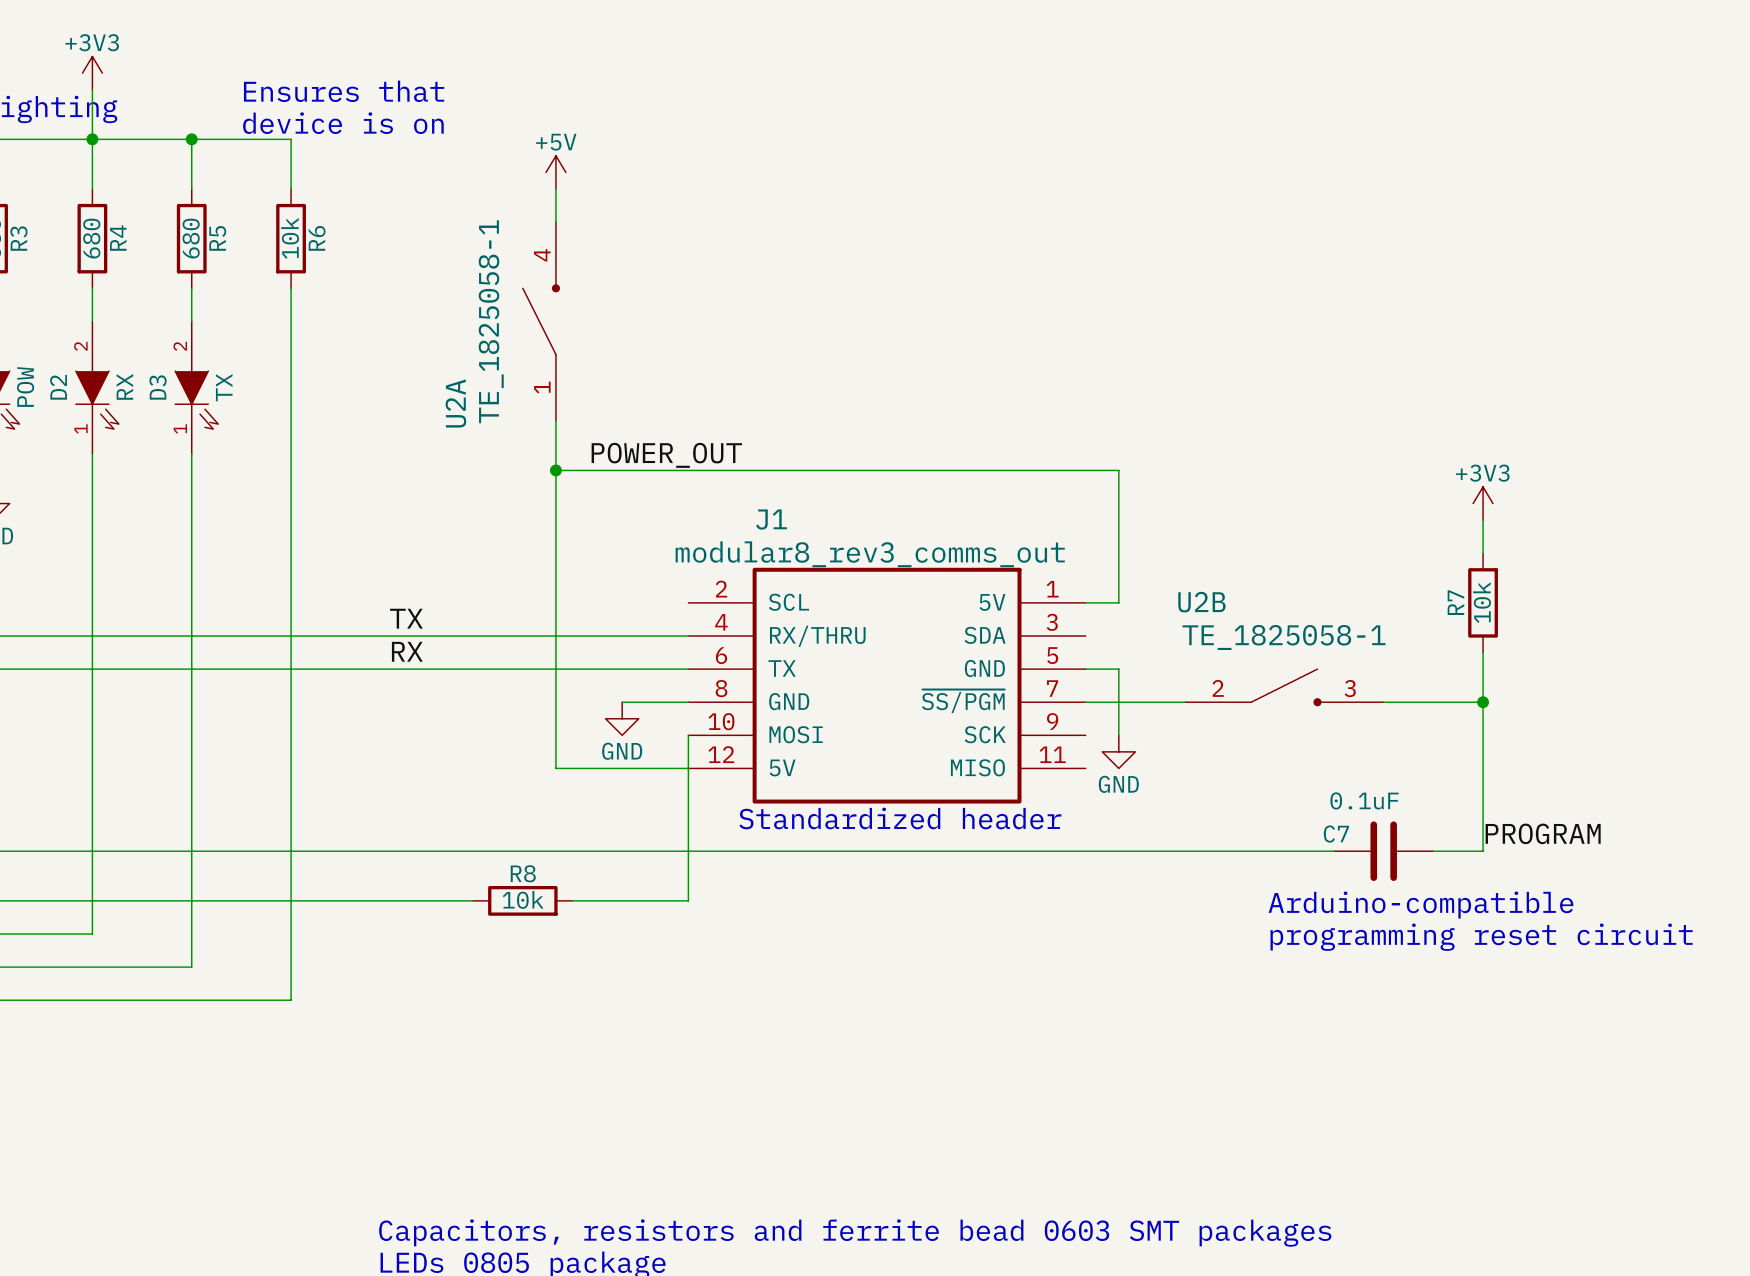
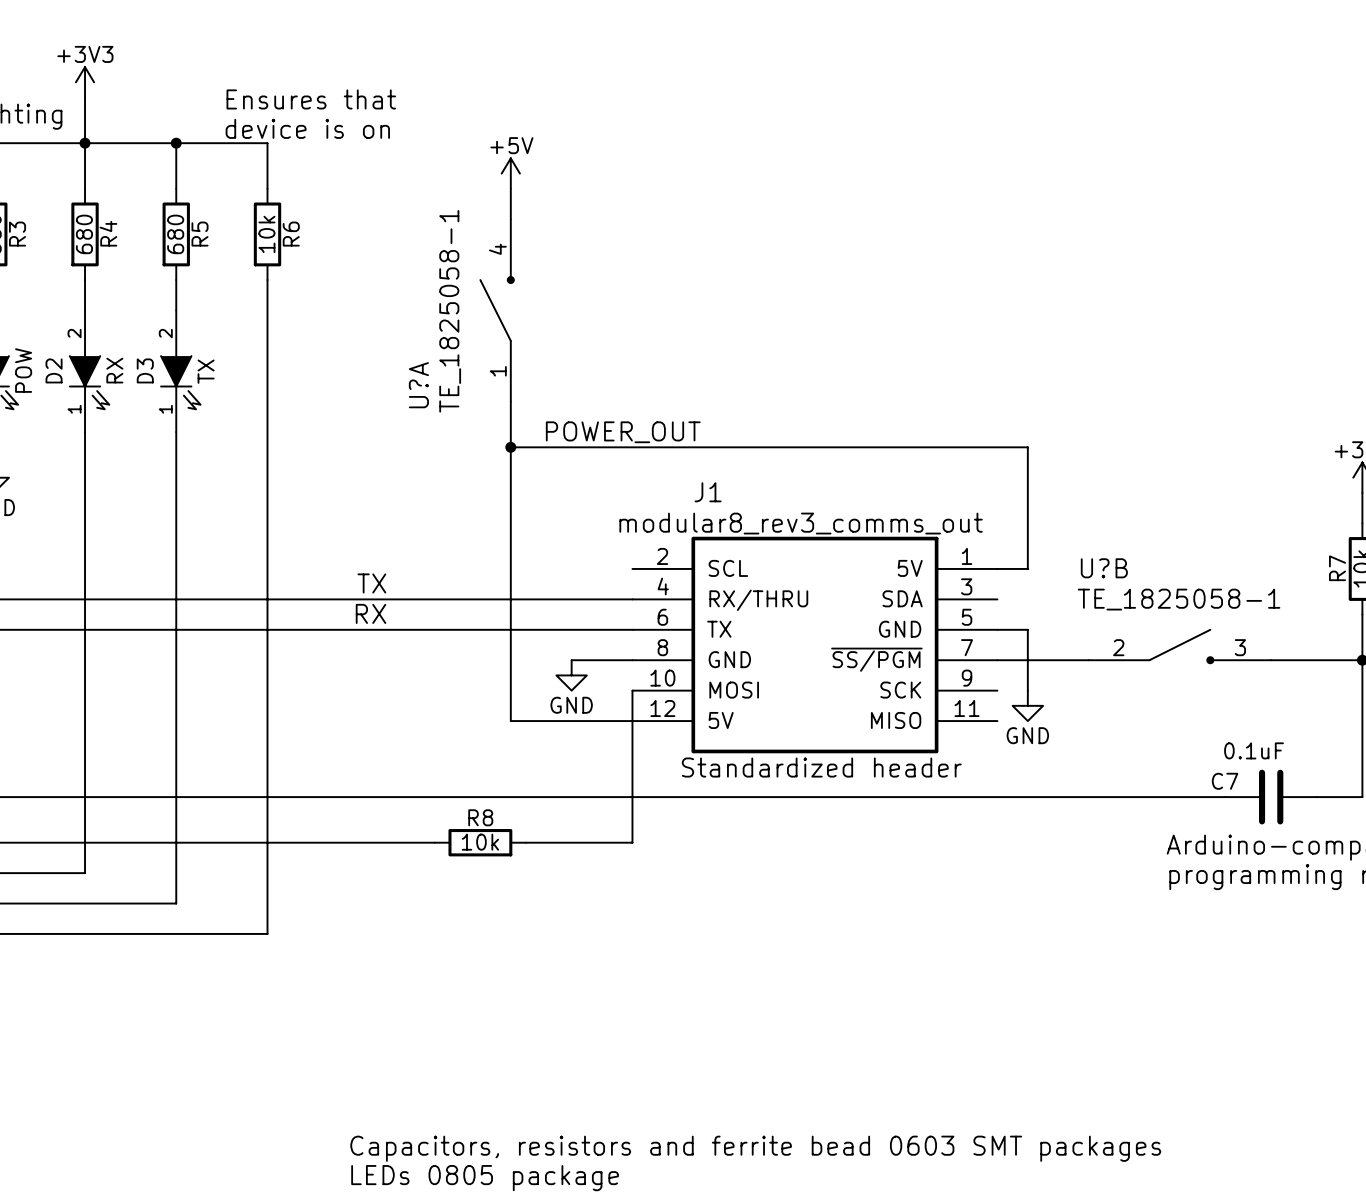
U2A name: U2A (455, 403) -> U?A (418, 385)
U2B name: U2B (1201, 602) -> U?B (1104, 568)

